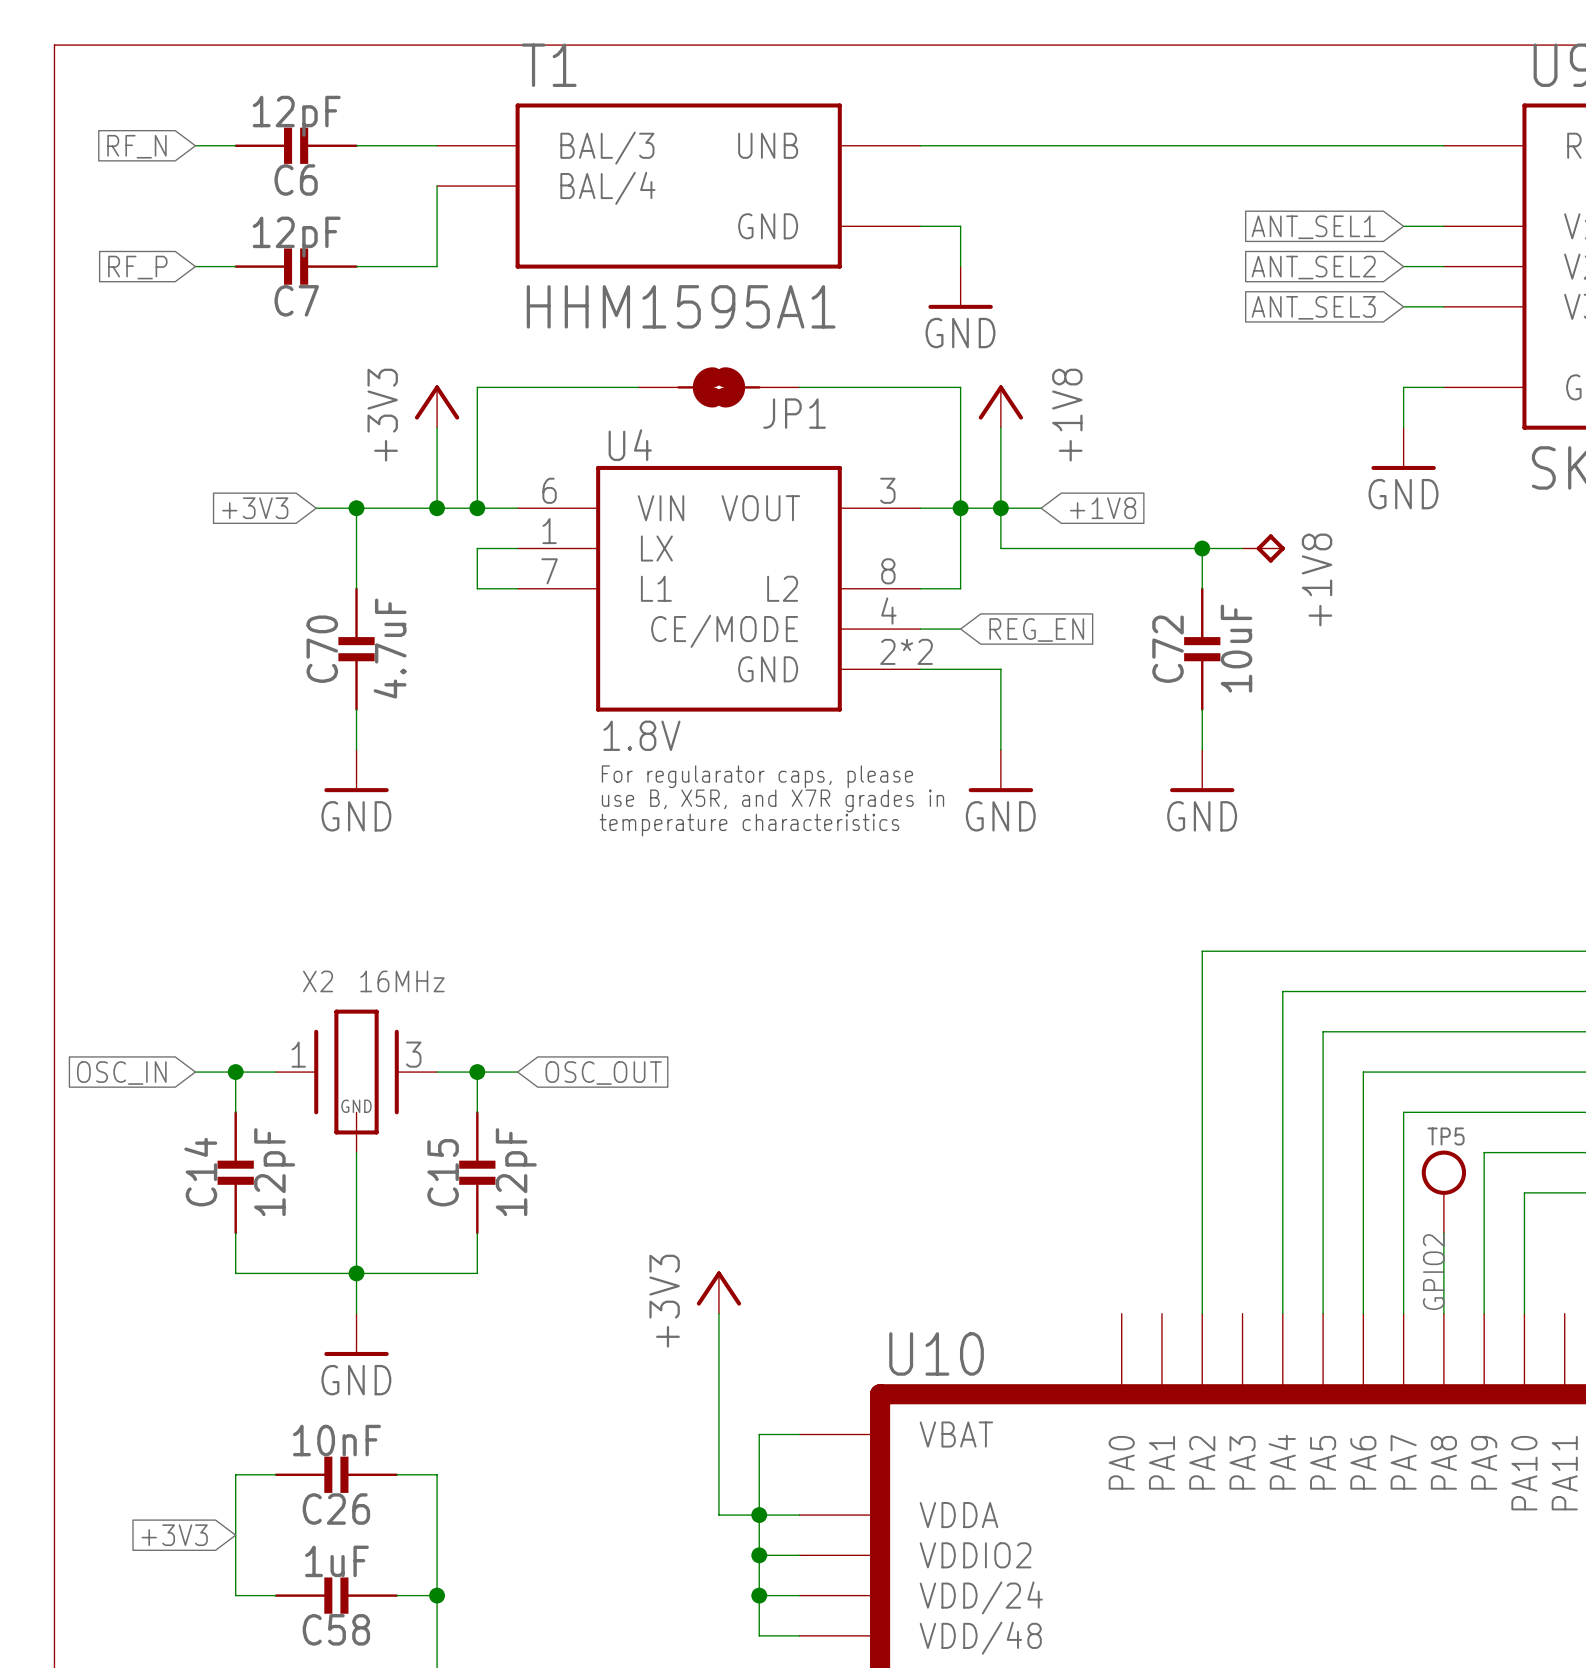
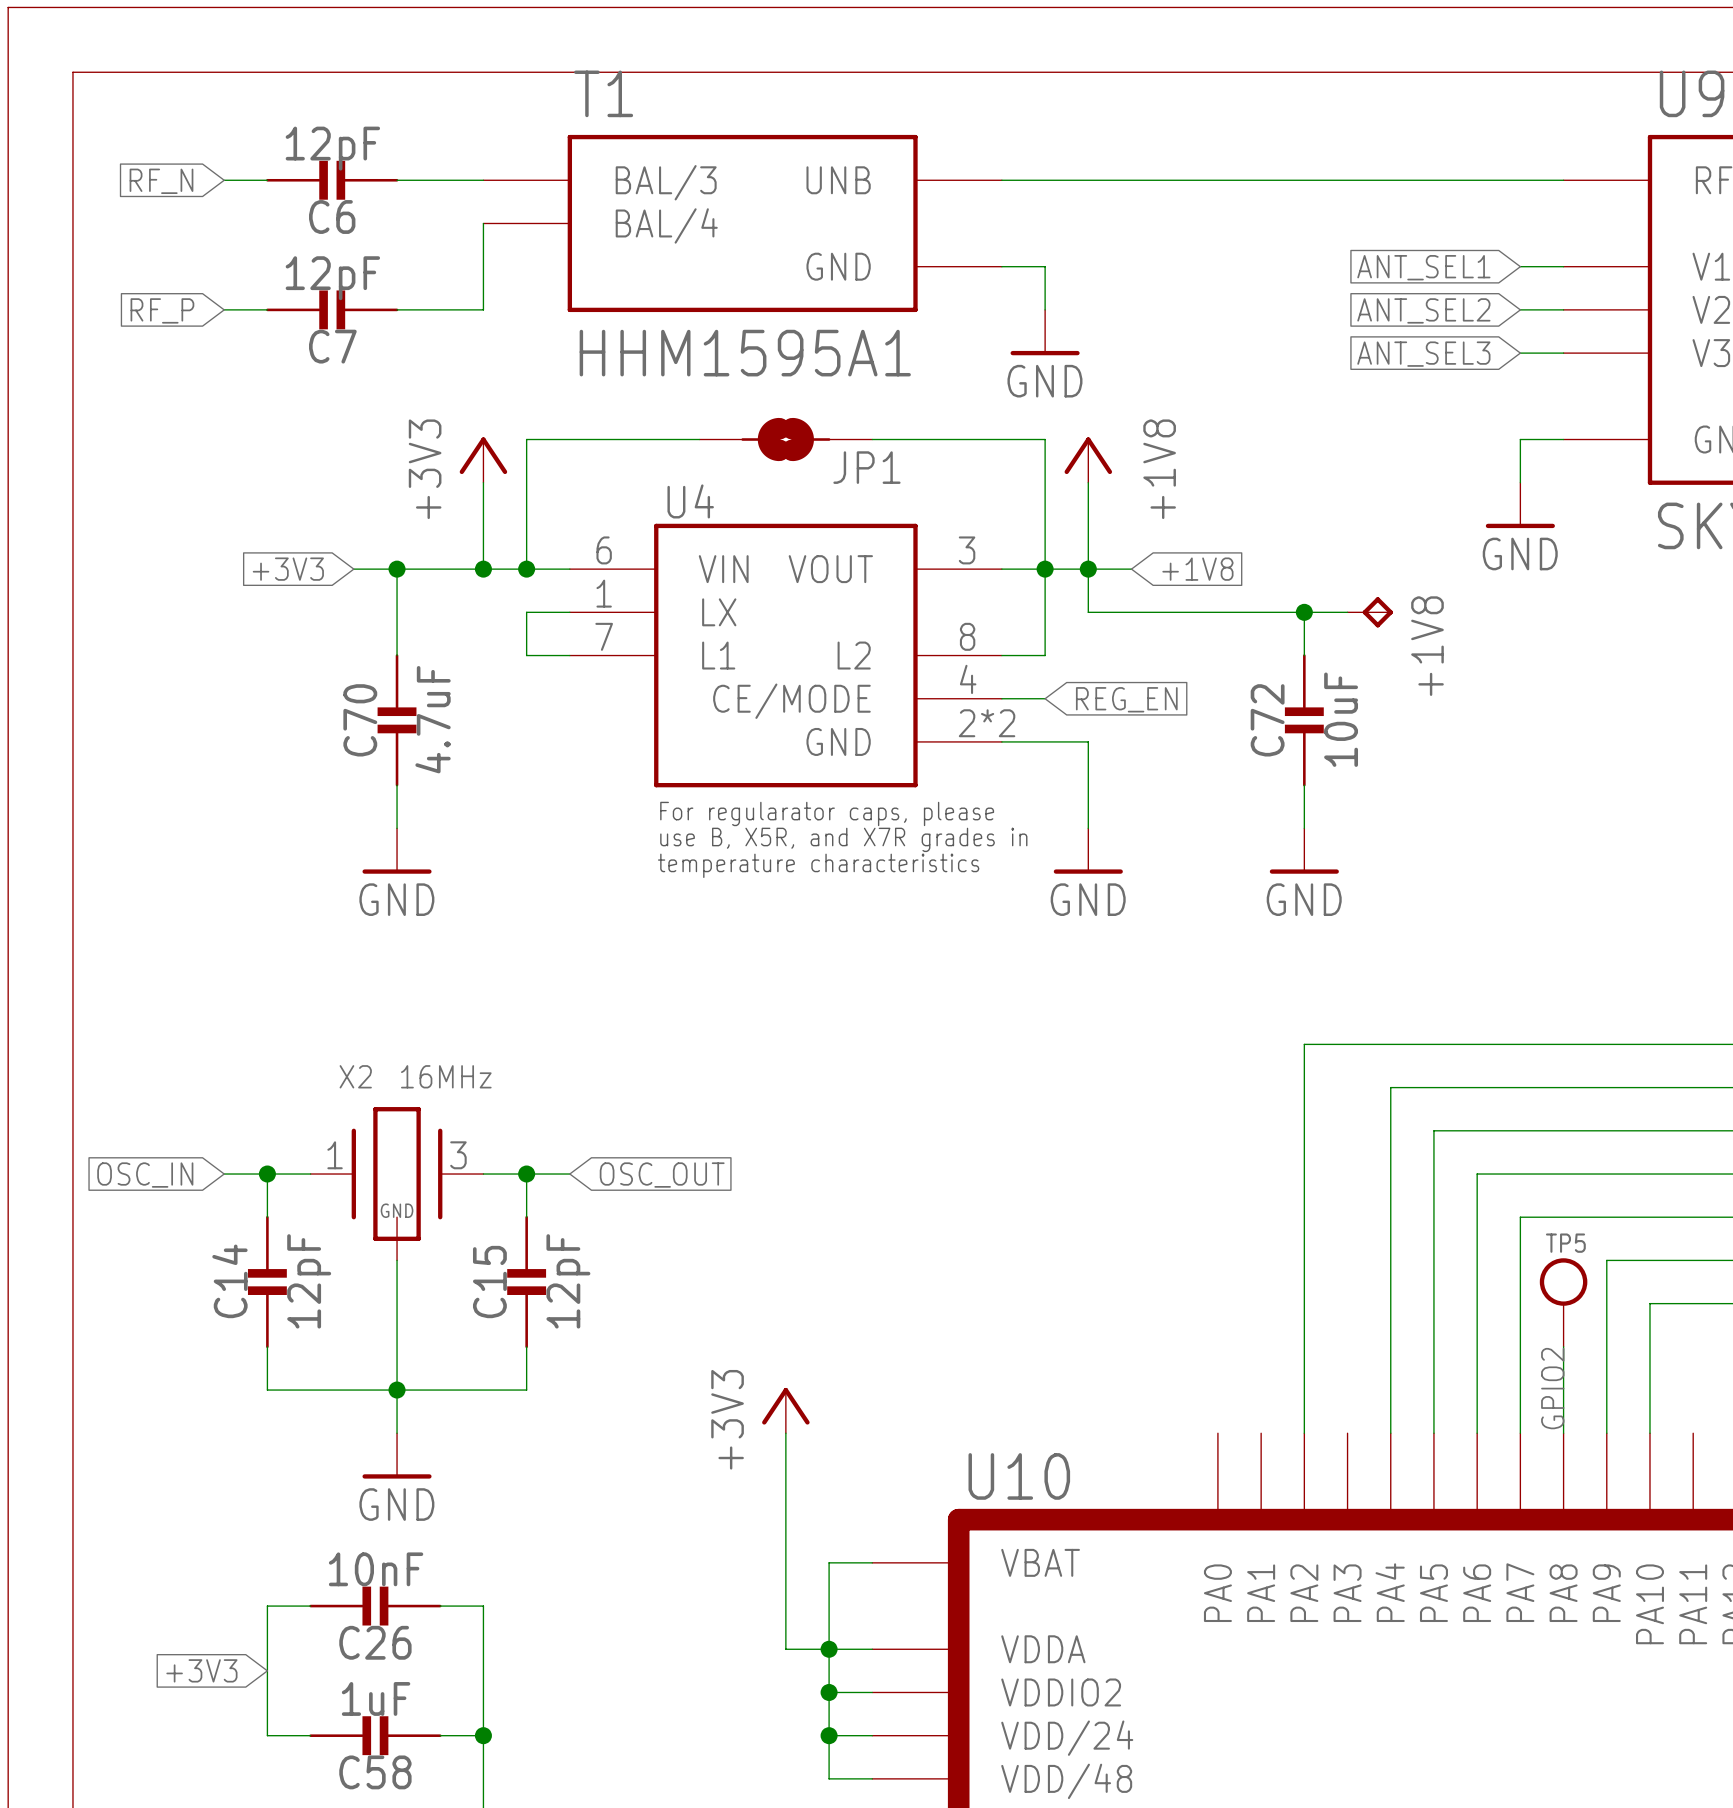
U4 value: 1.8V (641, 735) -> none
text position: For regularator caps, please (757, 776) -> For regularator caps, please (827, 813)
text position: use B, X5R, and X7R grades in (772, 800) -> use B, X5R, and X7R grades in (843, 839)
text position: temperature characteristics (749, 825) -> temperature characteristics (818, 865)

